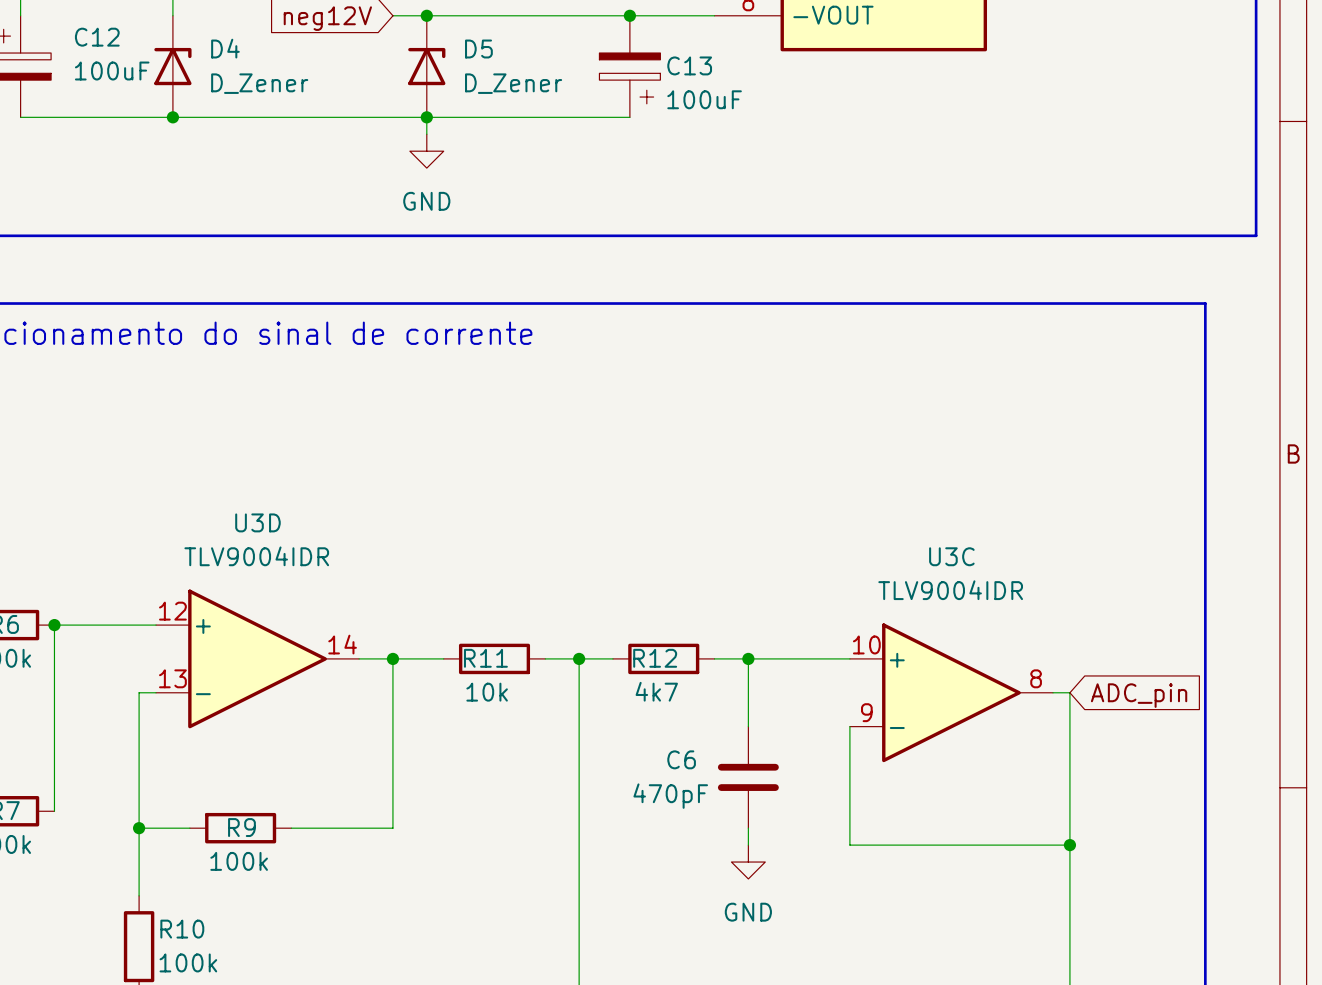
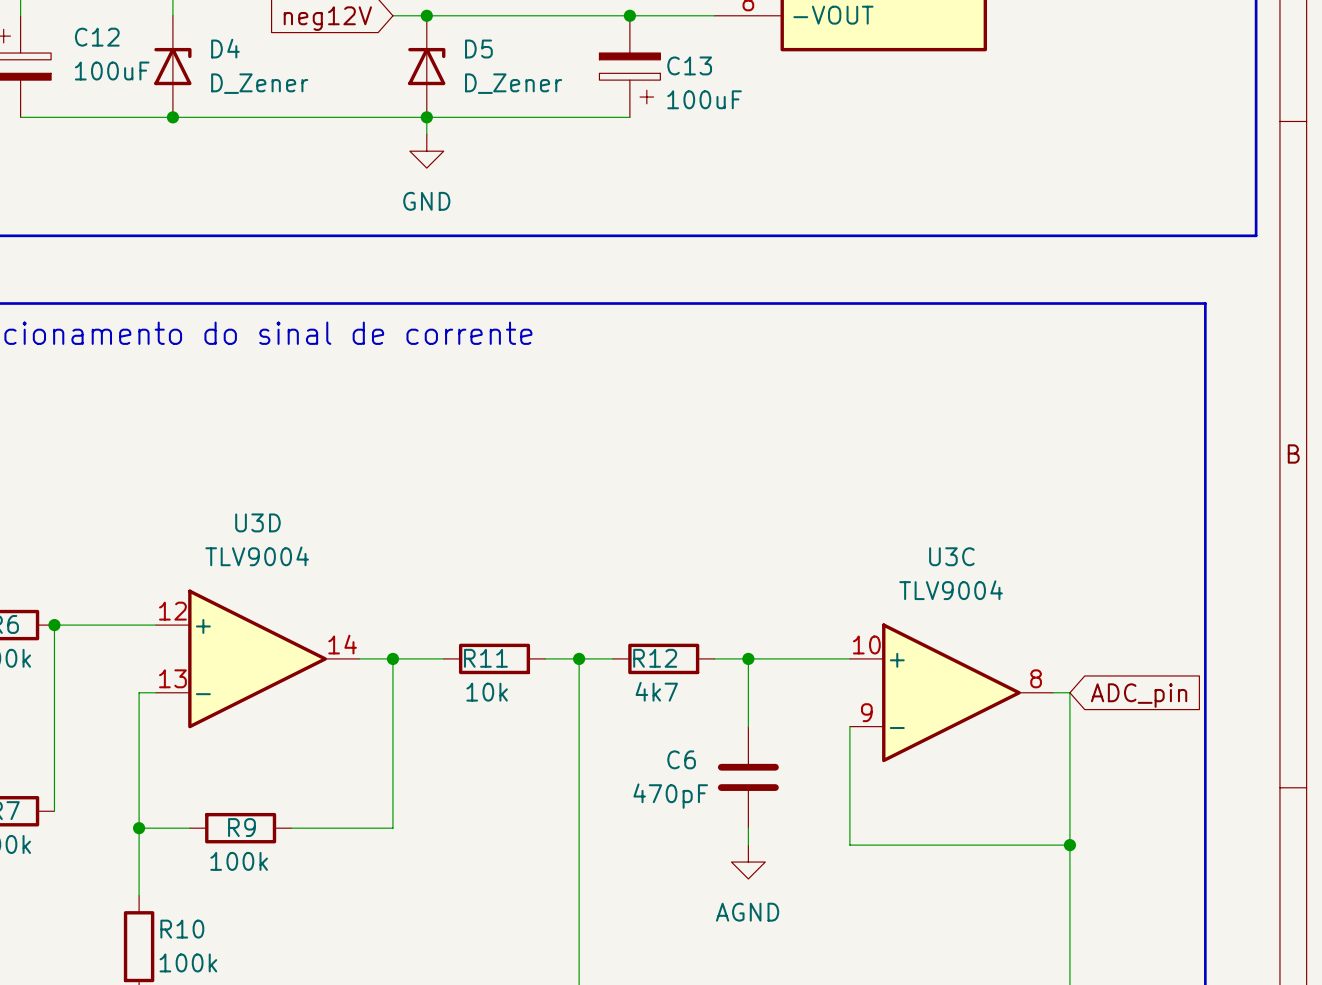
U3D value: TLV9004IDR (256, 556) -> TLV9004 (257, 556)
U3C value: TLV9004IDR (950, 590) -> TLV9004 (951, 590)
power symbol: GND (748, 862) -> AGND (748, 862)

